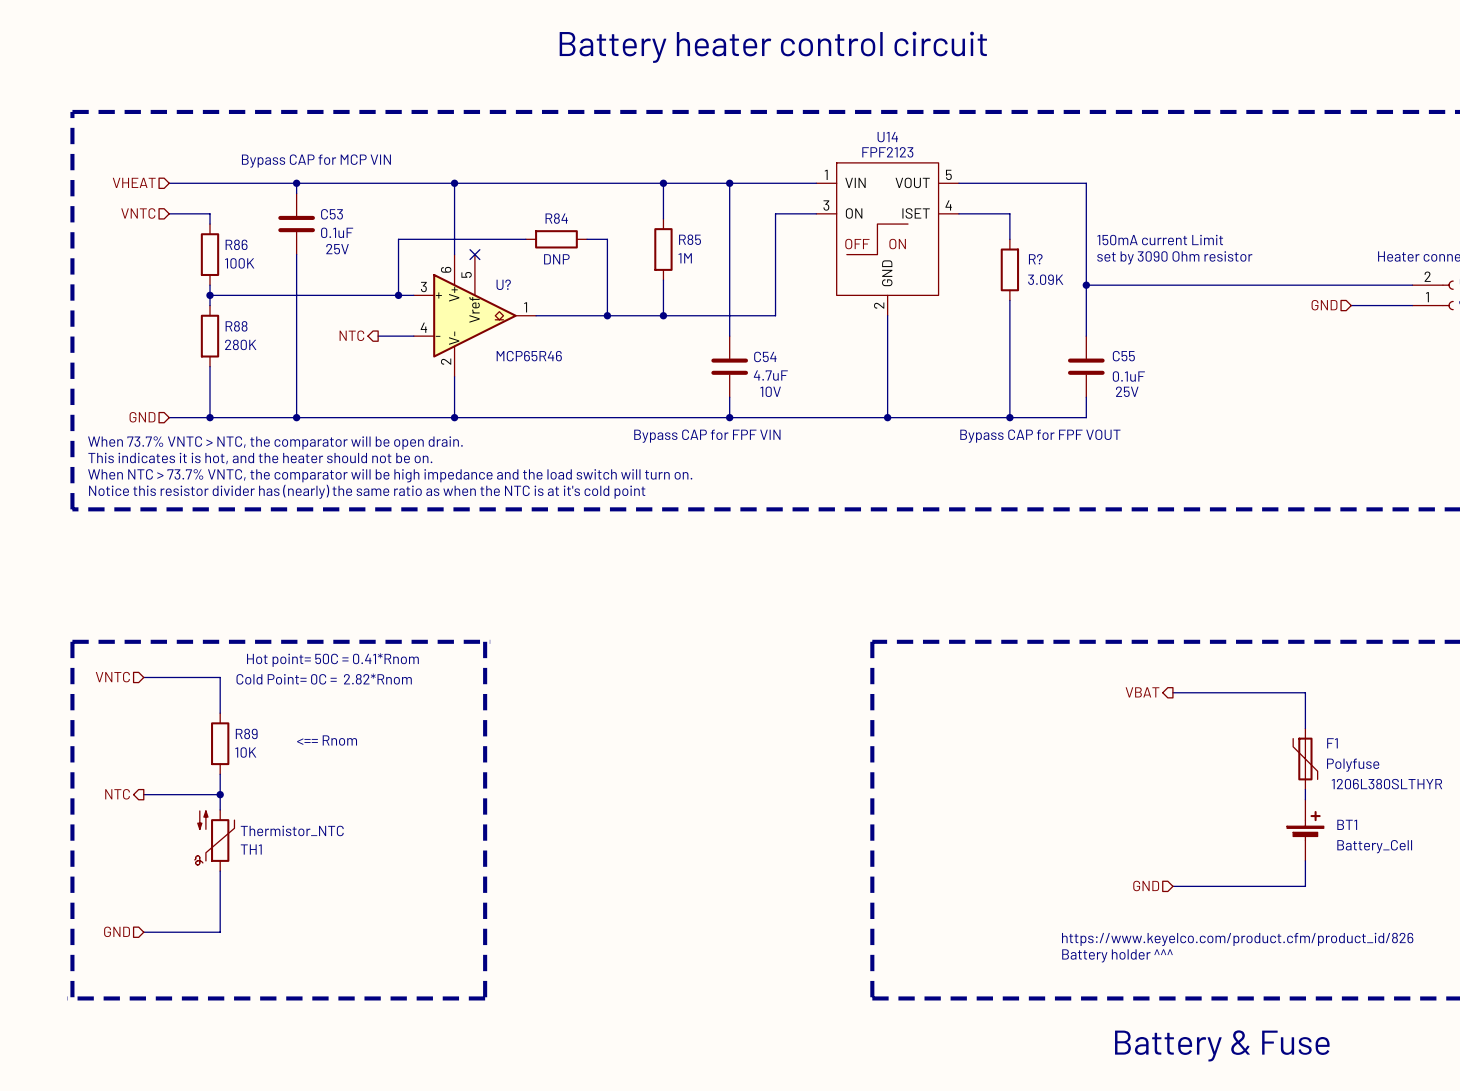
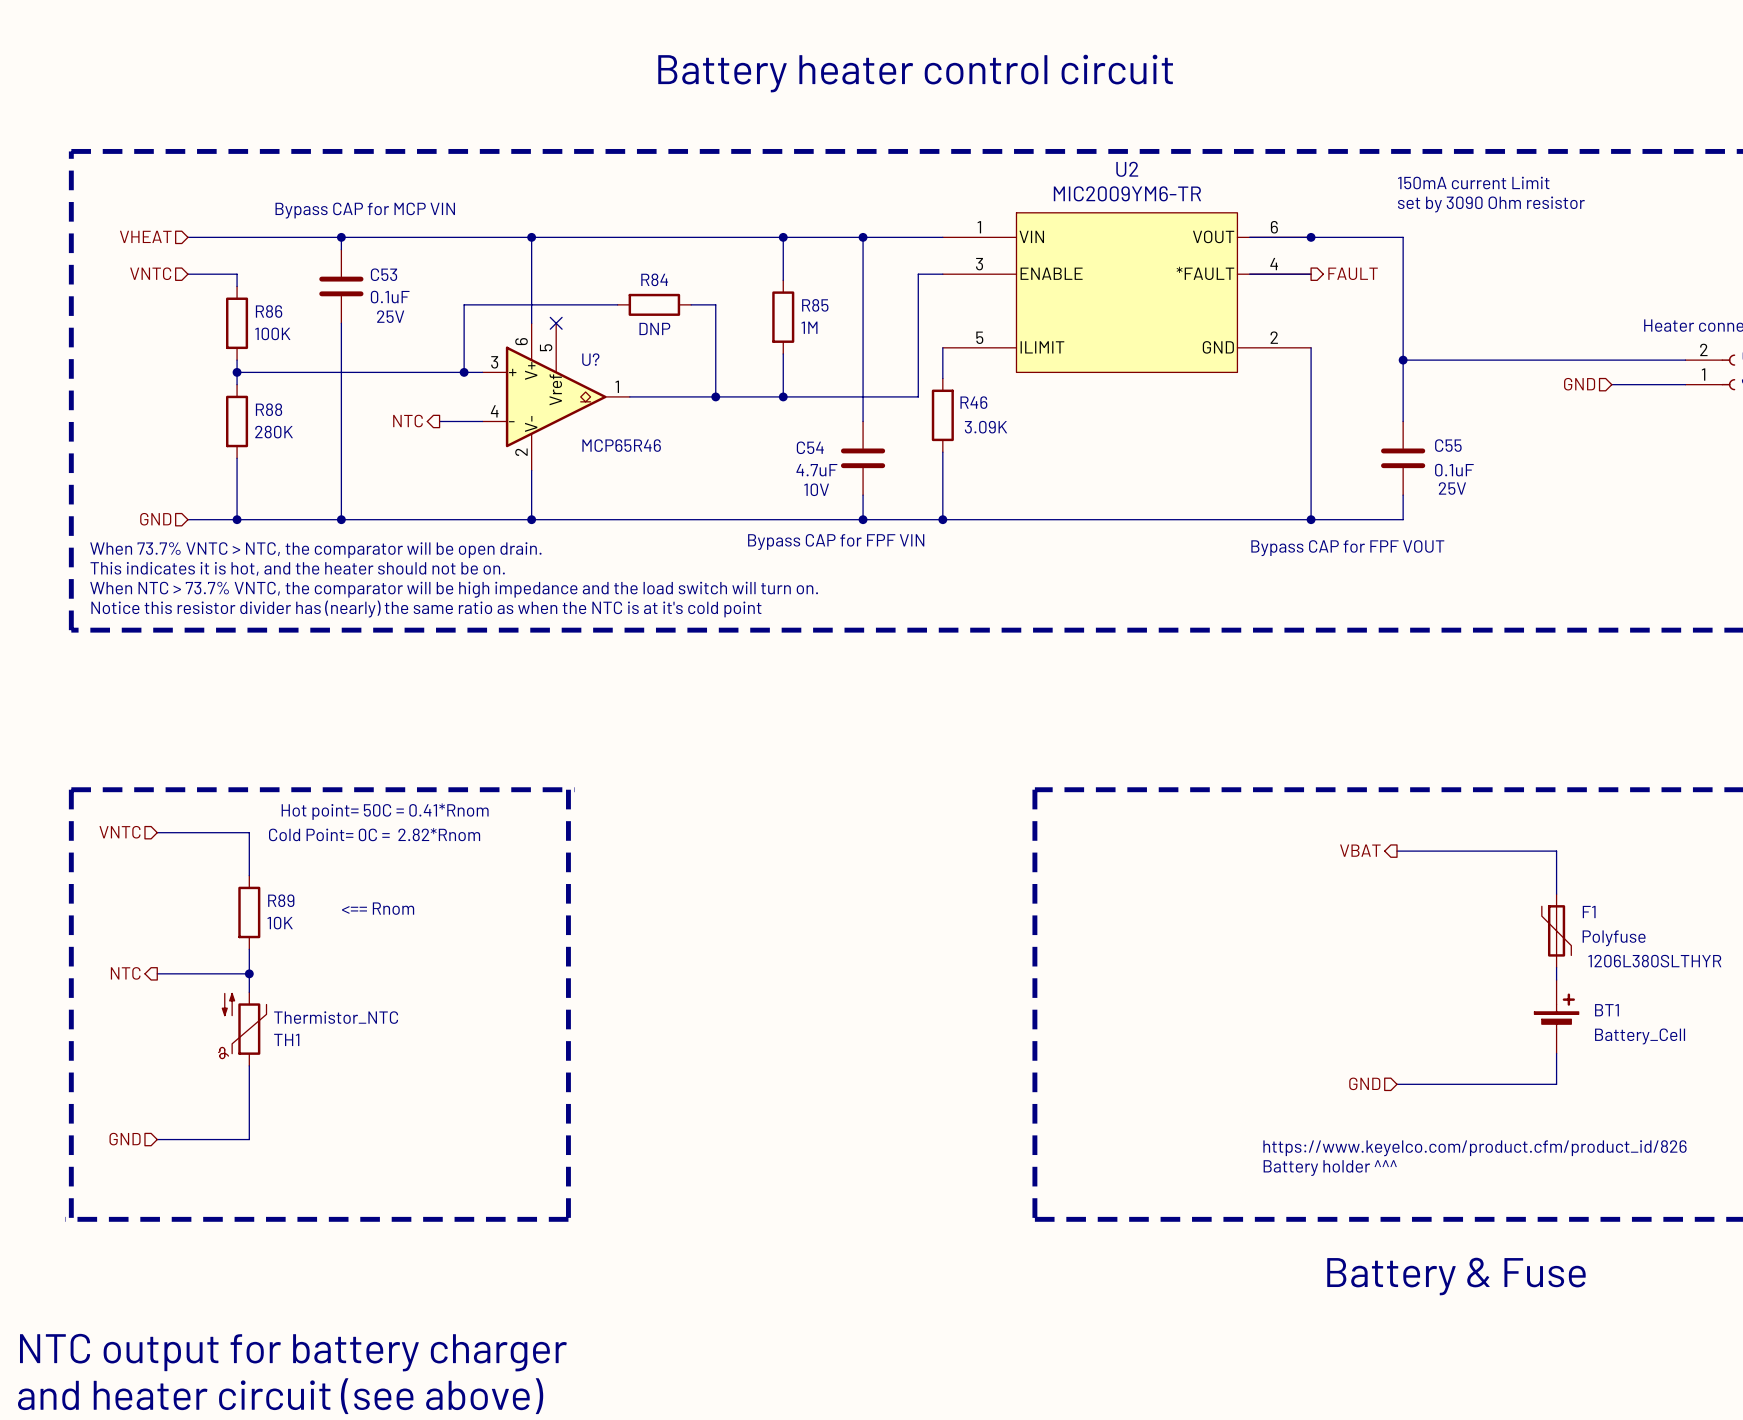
wire: (1086, 183) (1086, 336) -> (1292, 237) (1403, 237) (1403, 421)
junction: none -> (1311, 237)
wire: none -> (1249, 274) (1311, 274)
hierarchical label: none -> FAULT (1353, 273)
U2: none -> MIC2009YM6-TR (1126, 292)
U14: FPF2123 (887, 239) -> none
text position: 150mA current Limit (1160, 240) -> 150mA current Limit (1473, 183)
text position: set by 3090 Ohm resistor (1174, 257) -> set by 3090 Ohm resistor (1491, 204)
R?: 3.09K (1009, 269) -> none
wire: none -> (942, 347) (942, 378)
wire: none -> (1311, 347) (1311, 519)
wire: (1086, 285) (1178, 285) -> none
junction: (1086, 285) -> none
junction: none -> (1403, 360)
wire: (1009, 300) (1009, 417) -> none
wire: (887, 315) (887, 417) -> none
R46: none -> 3.09K (942, 415)
C54 name position: C54 (765, 356) -> C54 (810, 447)
wire: none -> (942, 452) (942, 519)
C55 position: (1086, 366) -> (1403, 458)
C54 value position: 4.7uF (770, 375) -> 4.7uF (816, 470)
C54 text position: 10V (770, 391) -> 10V (816, 489)
wire: (1086, 397) (1086, 417) -> (1403, 495) (1403, 519) (1292, 519)
junction: none -> (942, 519)
junction: (887, 417) -> none
junction: (1009, 417) -> none
junction: none -> (1311, 519)
text position: Bypass CAP for FPF VOUT (1040, 436) -> Bypass CAP for FPF VOUT (1347, 548)

